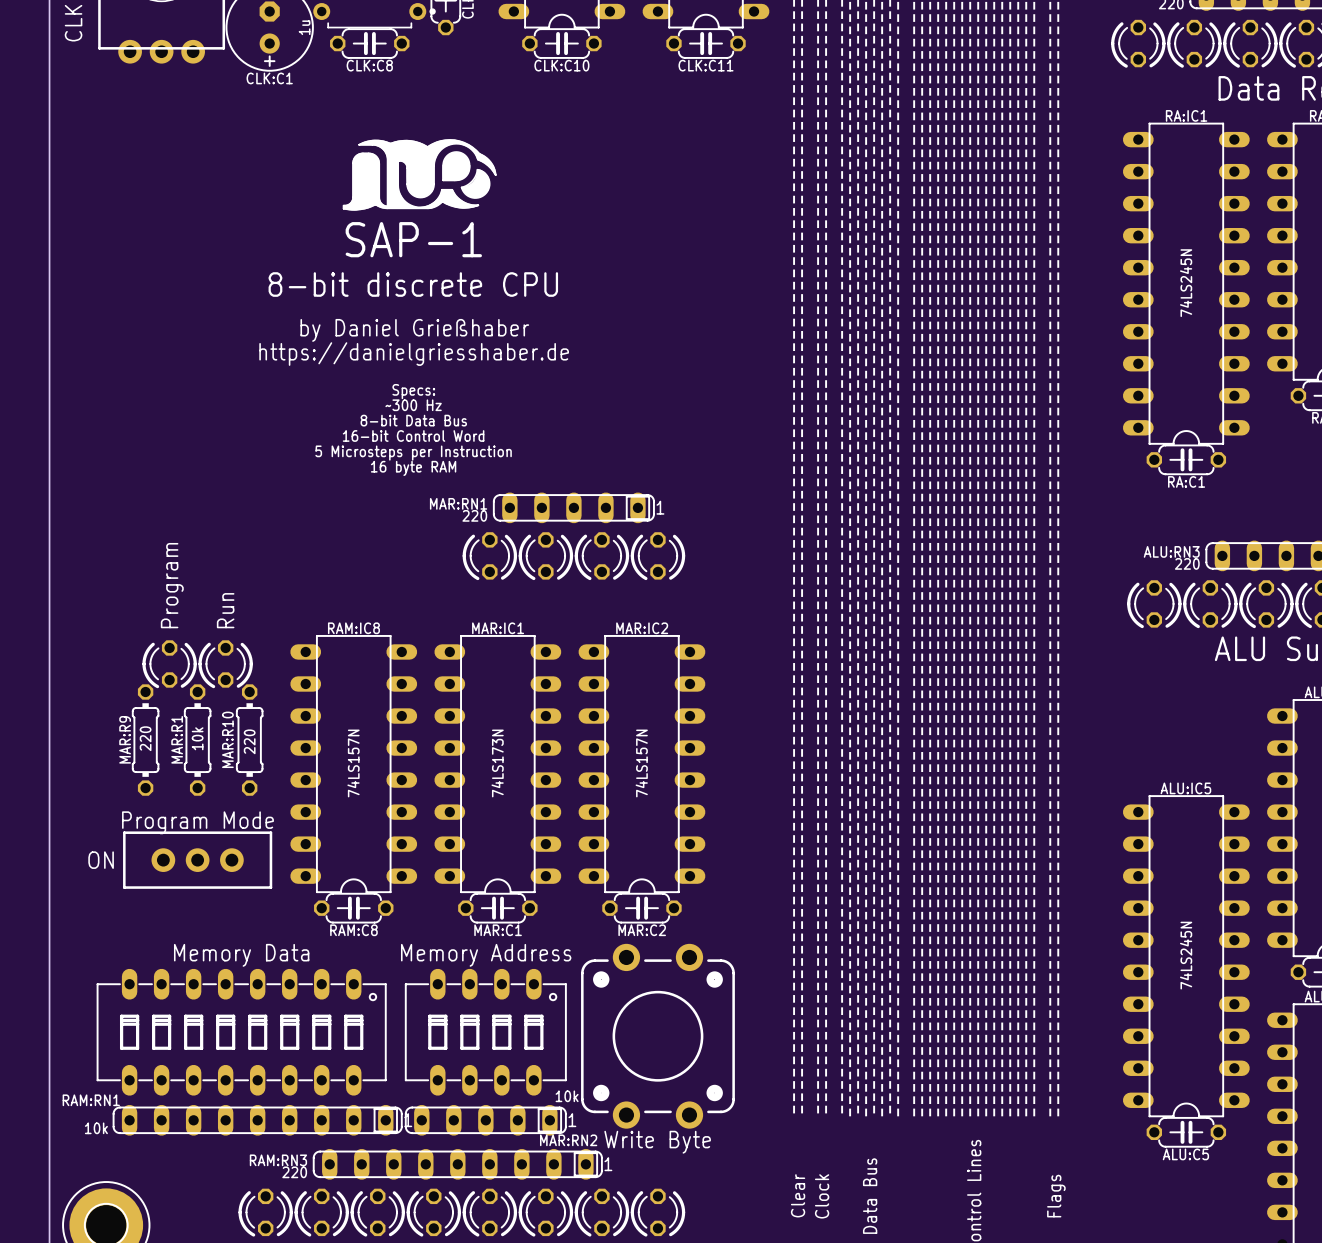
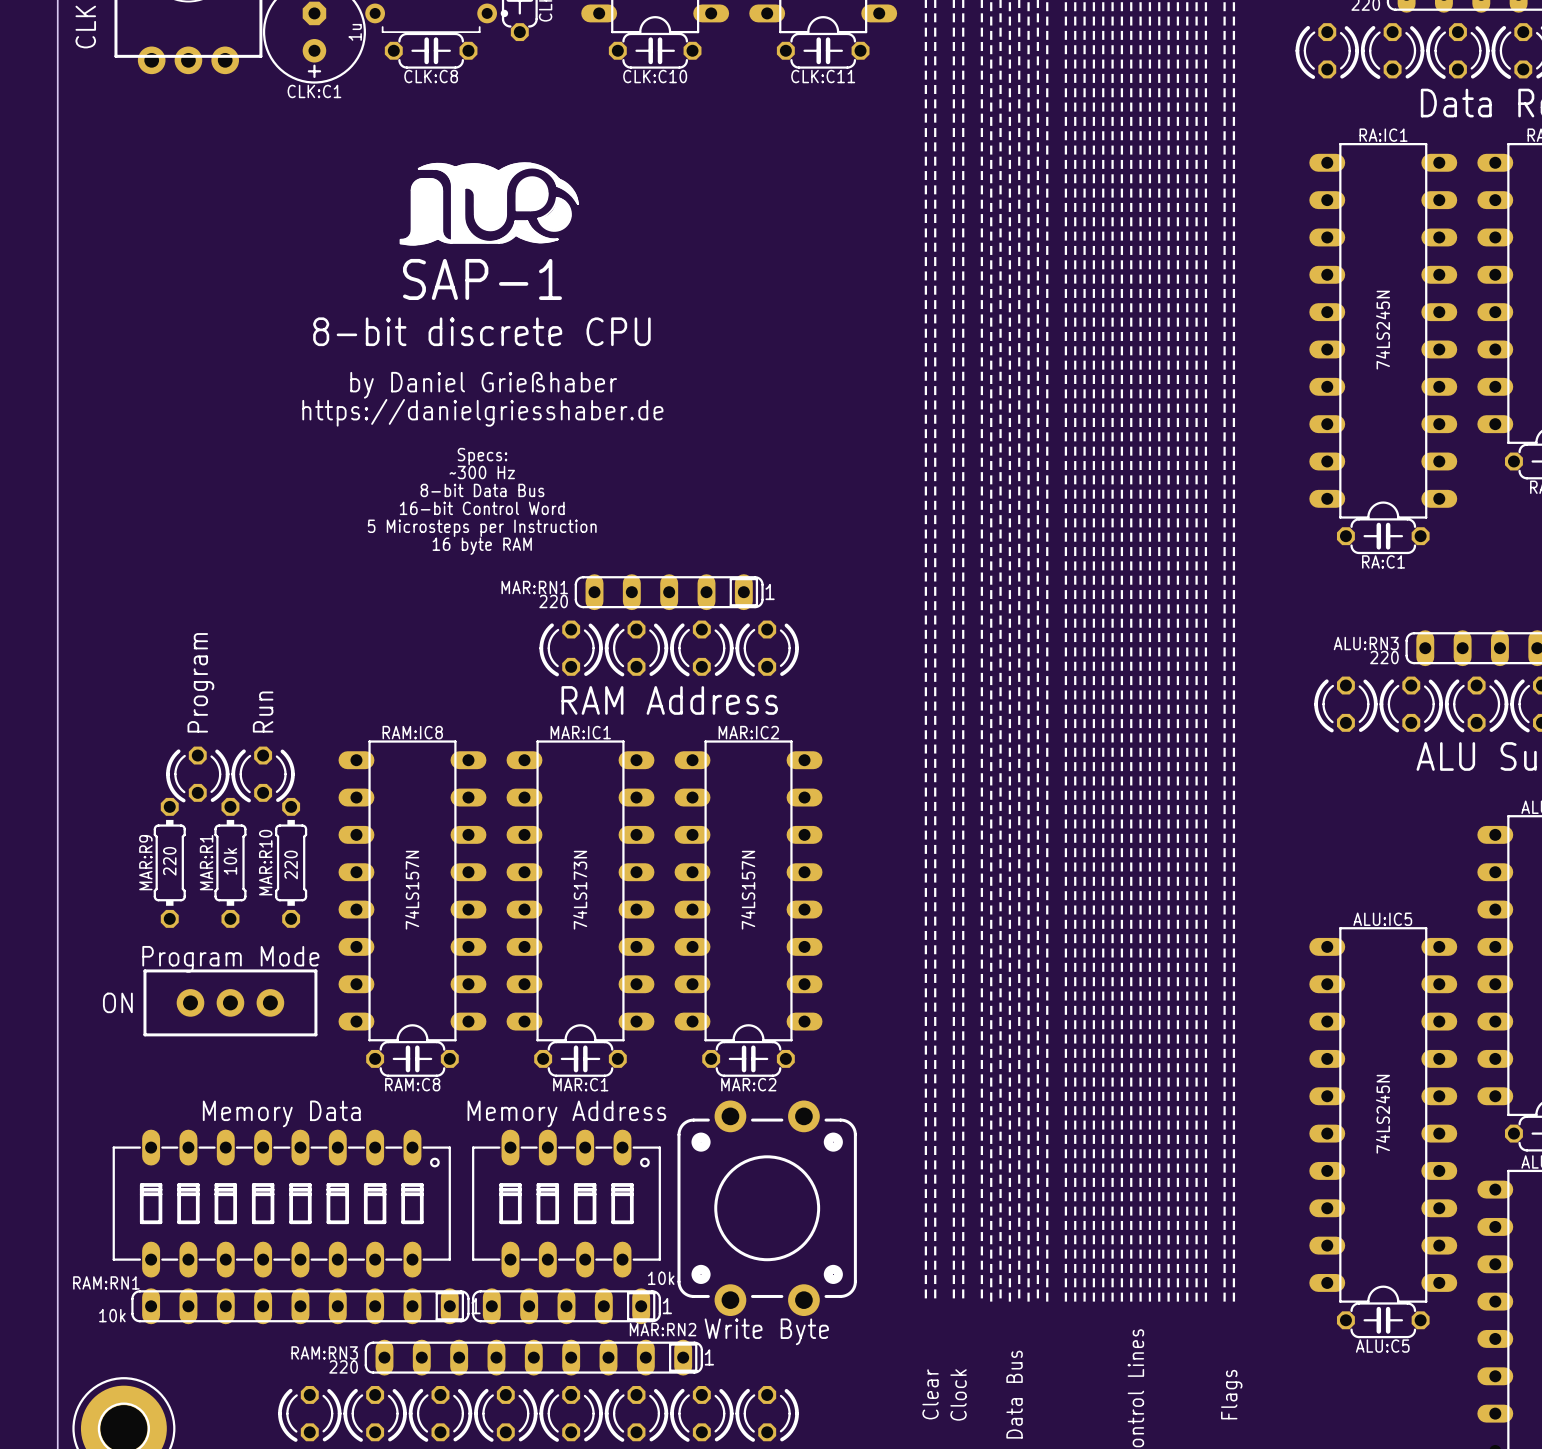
text: none -> RAM Address (669, 700)

